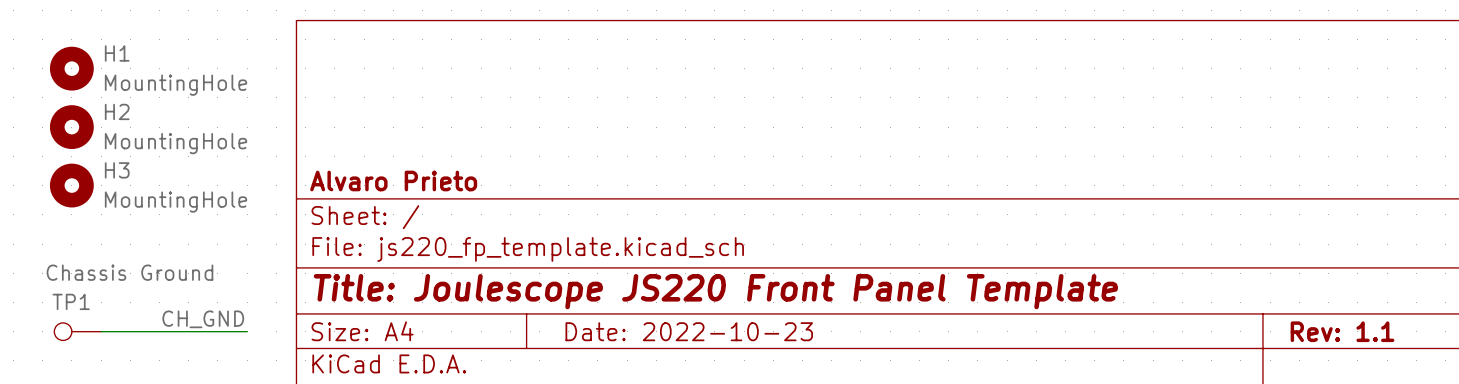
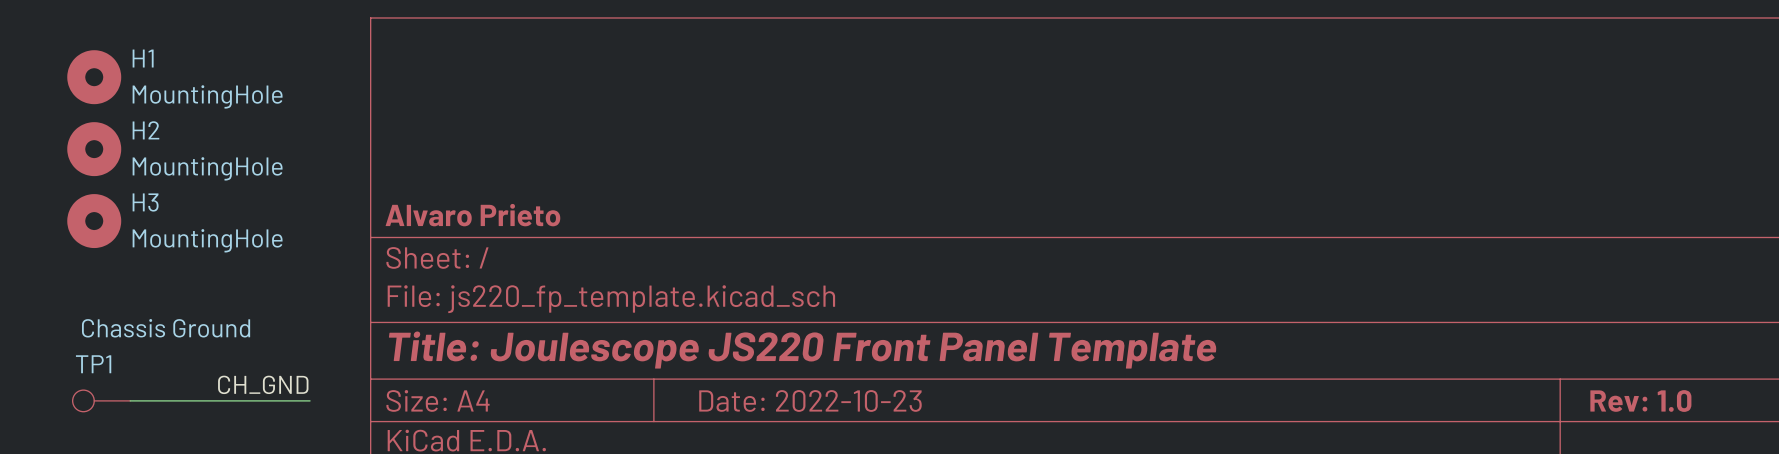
title block: Rev: 1.1 (1342, 331) -> Rev: 1.0 (1640, 401)

